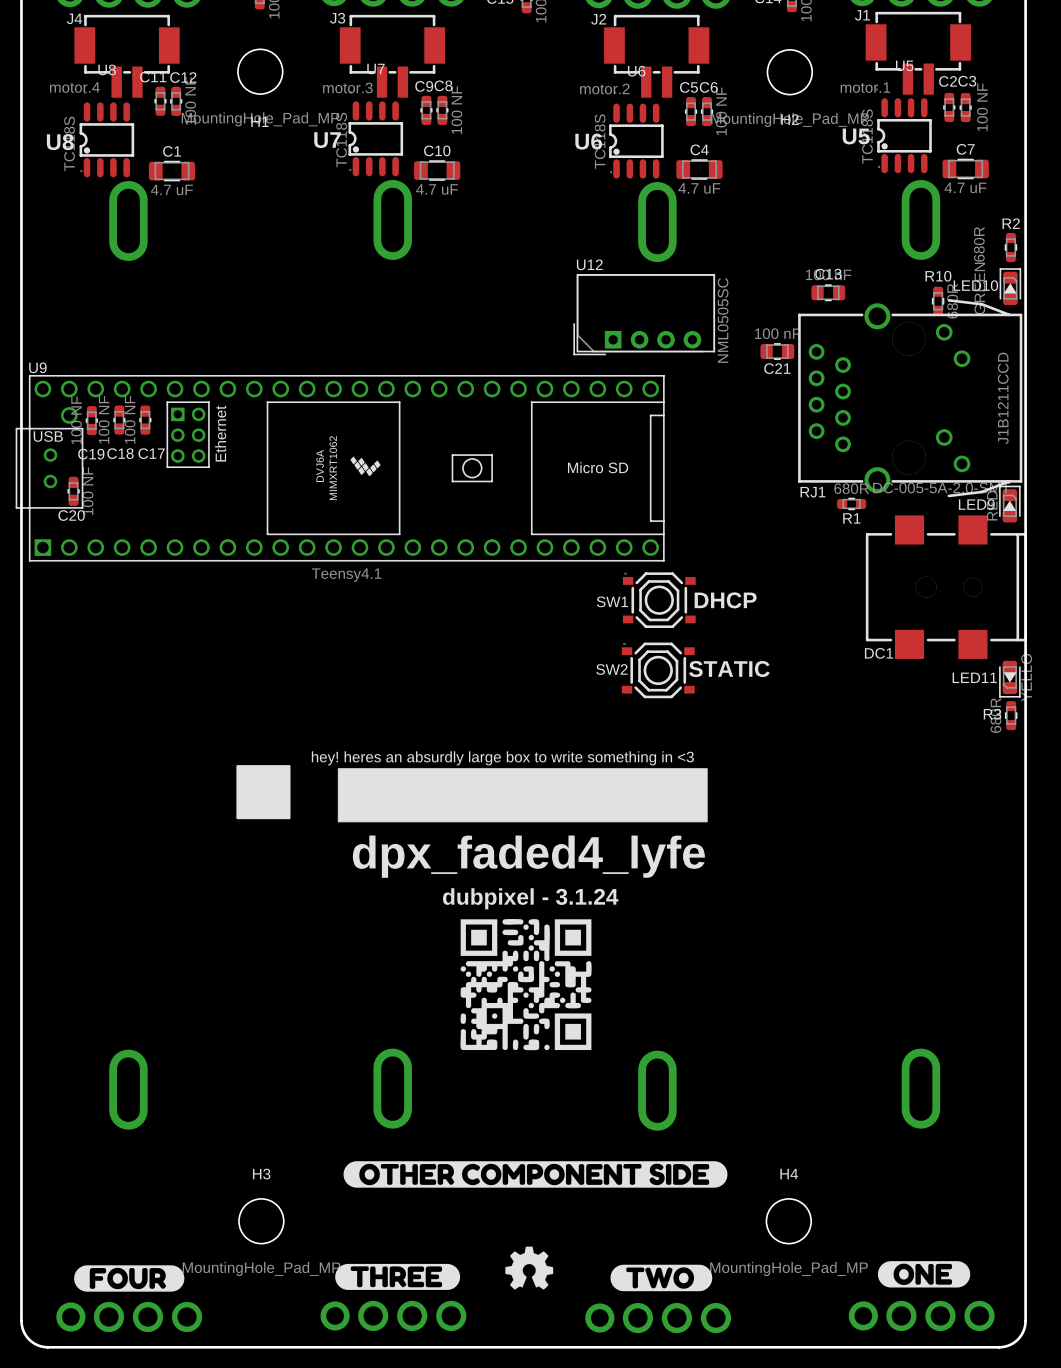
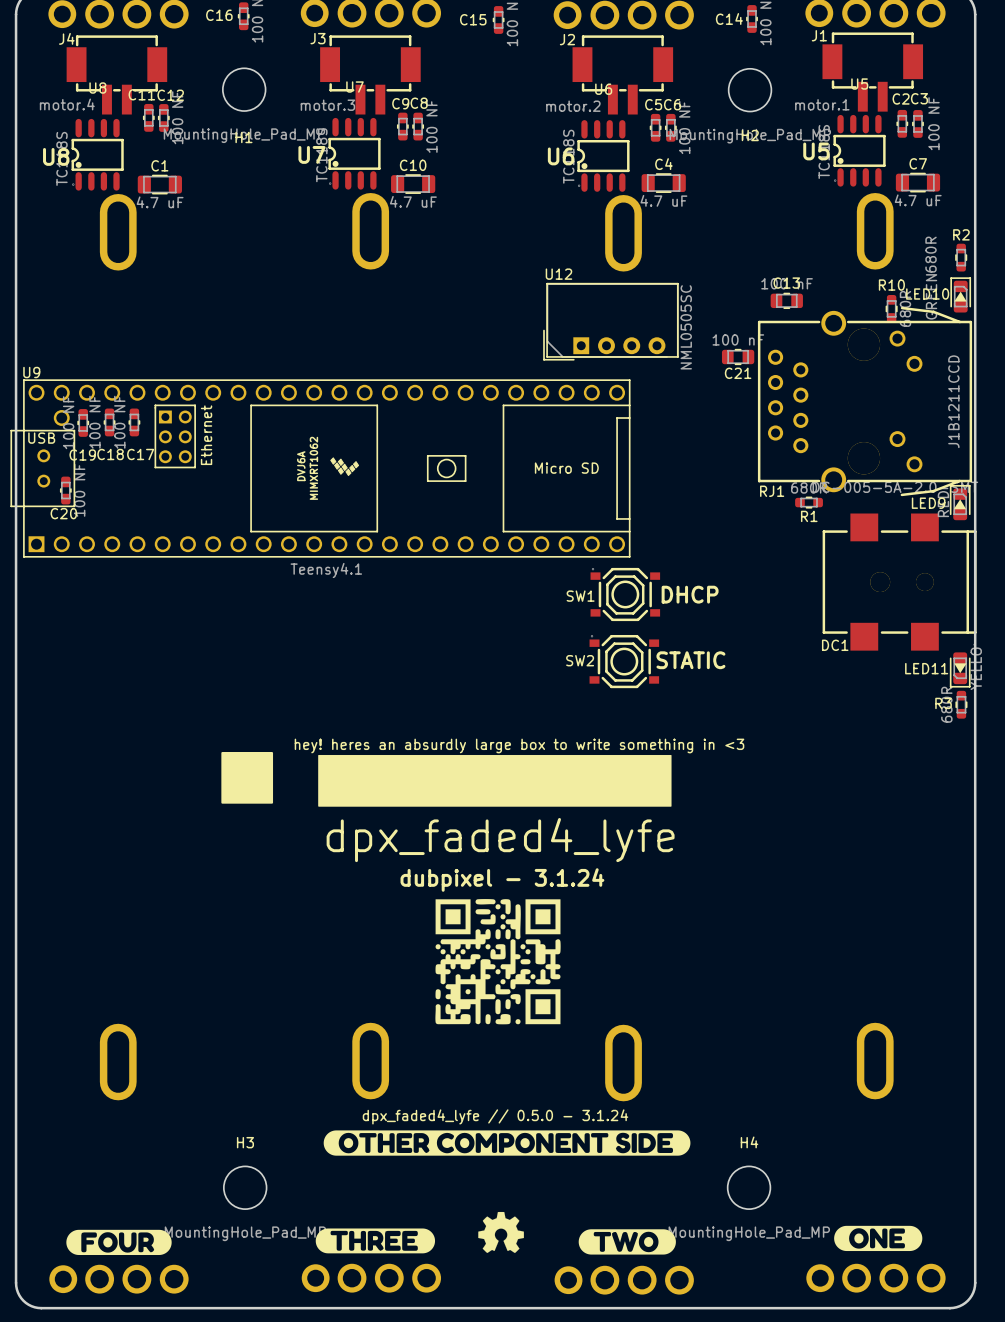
text: none -> dpx_faded4_lyfe // 0.5.0 - 3.1.24 (495, 1116)

